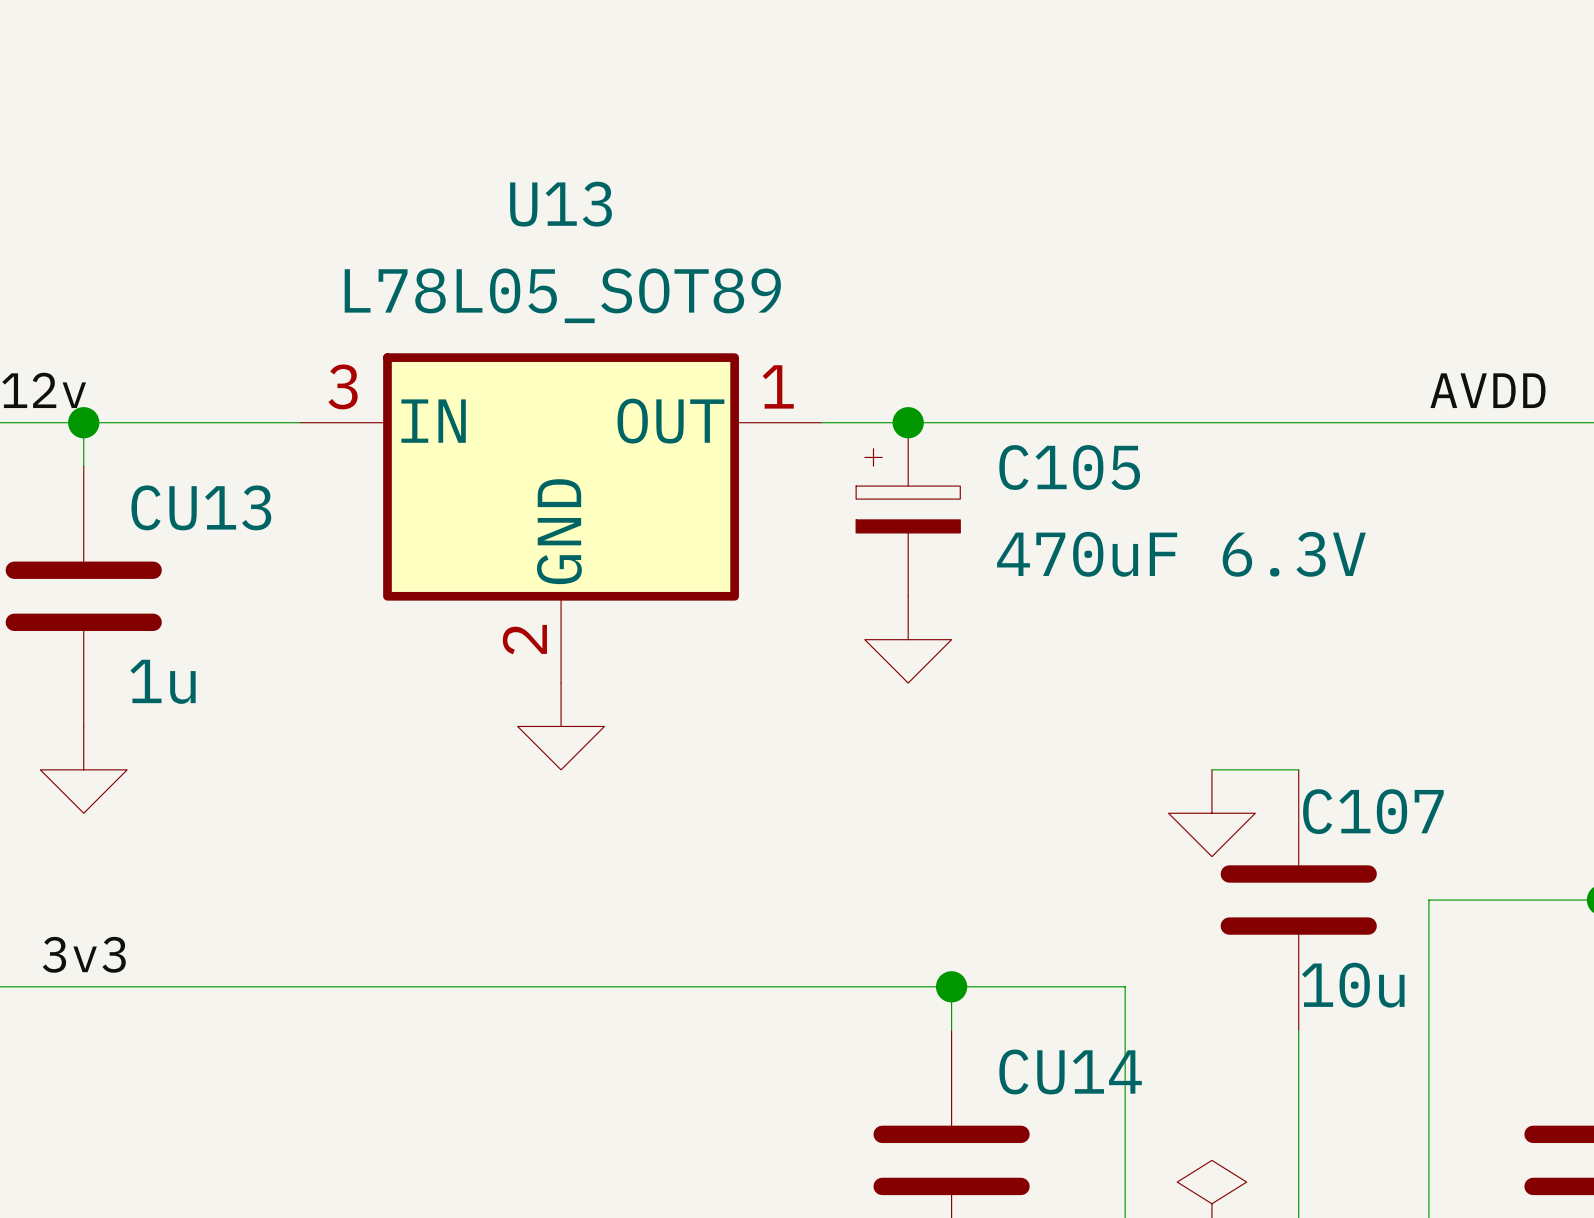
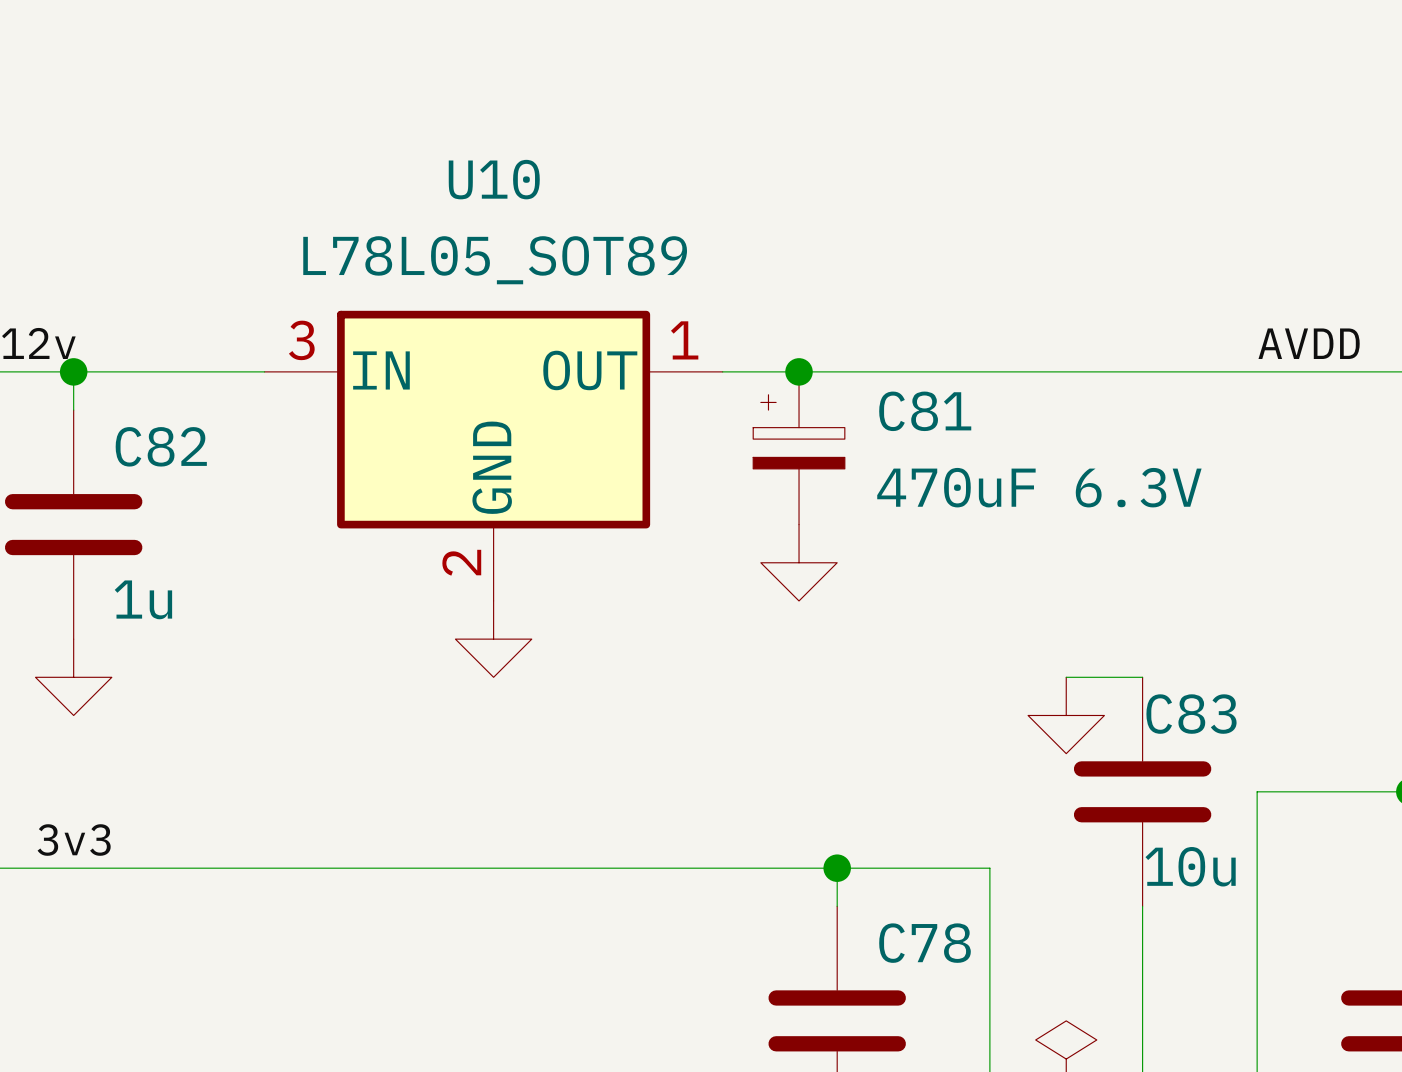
U13 name: U13 (560, 204) -> U10 (494, 179)
C105 name: C105 (1069, 467) -> C81 (925, 411)
CU13 name: CU13 (201, 507) -> C82 (161, 446)
C107 name: C107 (1373, 811) -> C83 (1191, 714)
CU14 name: CU14 (1070, 1071) -> C78 (925, 943)

